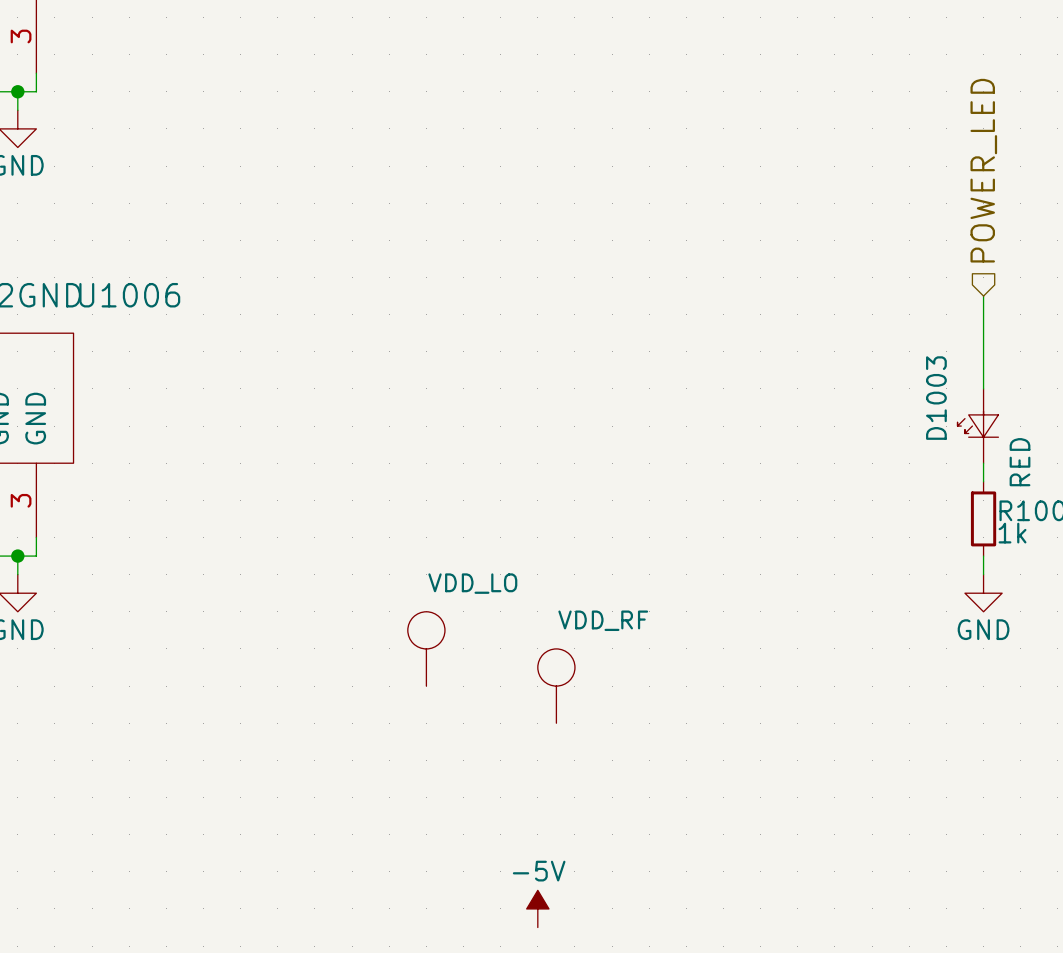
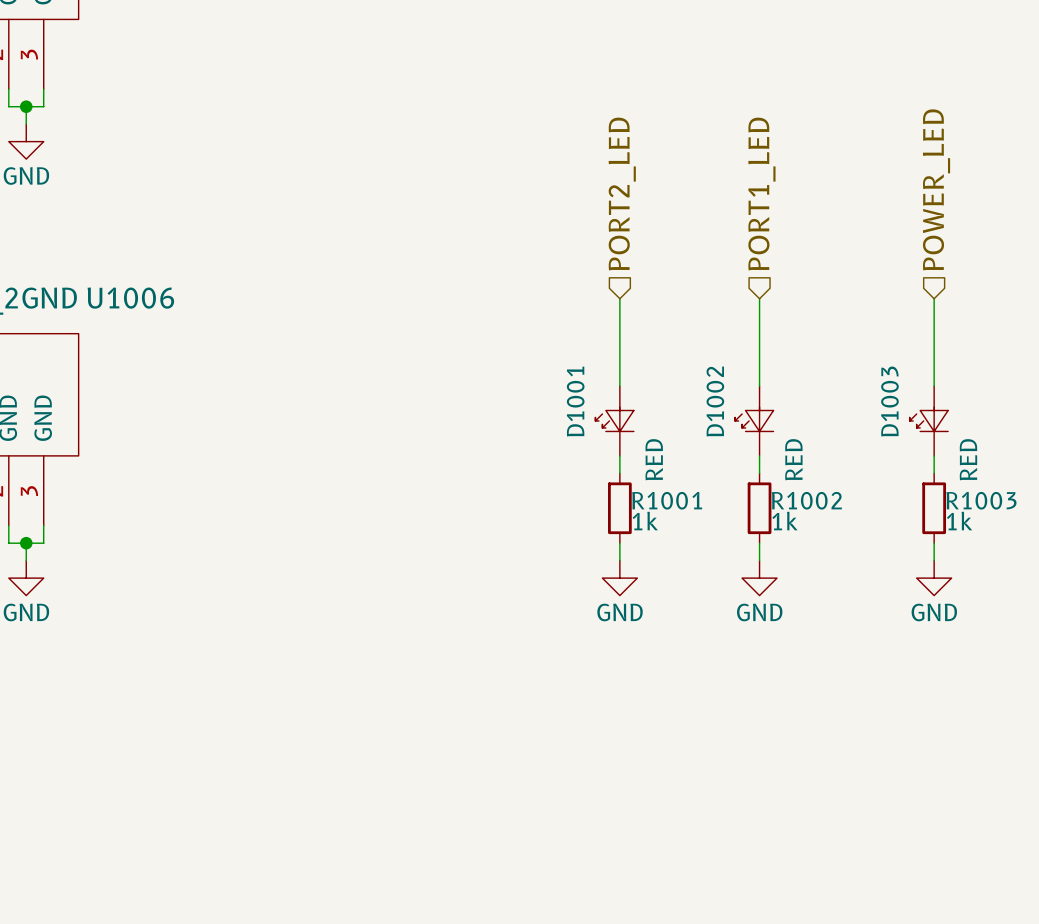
hierarchical label: none -> PORT2_LED (622, 194)
hierarchical label: none -> PORT1_LED (761, 194)
wire: none -> (619, 298) (619, 386)
wire: none -> (759, 298) (759, 386)
D1001: none -> RED (614, 420)
D1002: none -> RED (754, 420)
wire: none -> (619, 455) (619, 473)
wire: none -> (759, 455) (759, 473)
R1001: none -> 1k (619, 508)
R1002: none -> 1k (759, 508)
wire: none -> (619, 543) (619, 560)
wire: none -> (759, 543) (759, 560)
power symbol: none -> GND (619, 578)
power symbol: none -> GND (759, 578)
power symbol: VDD_LO (426, 648) -> none
power symbol: VDD_RF (556, 686) -> none
power symbol: -5V (537, 908) -> none

